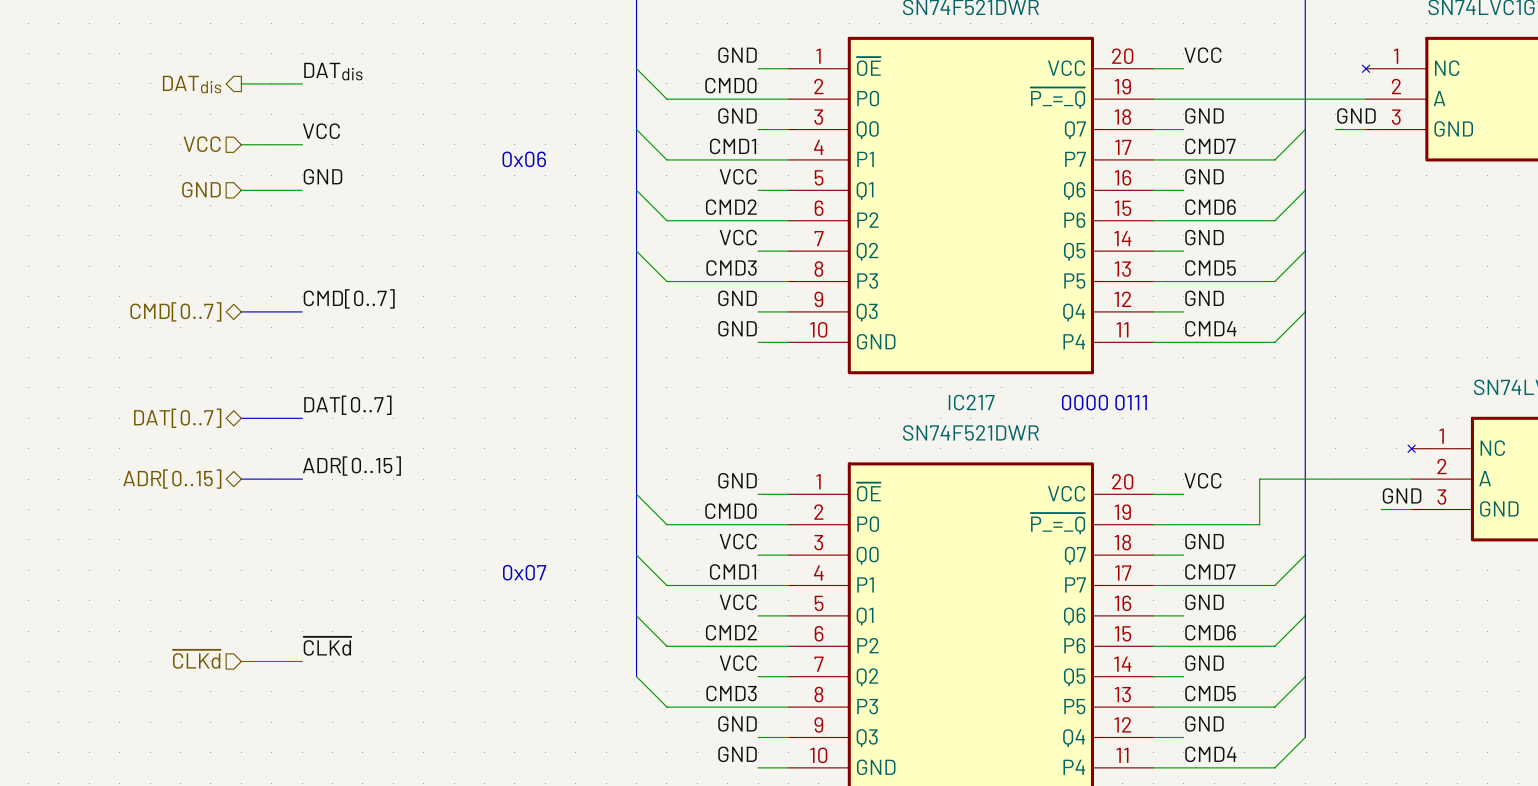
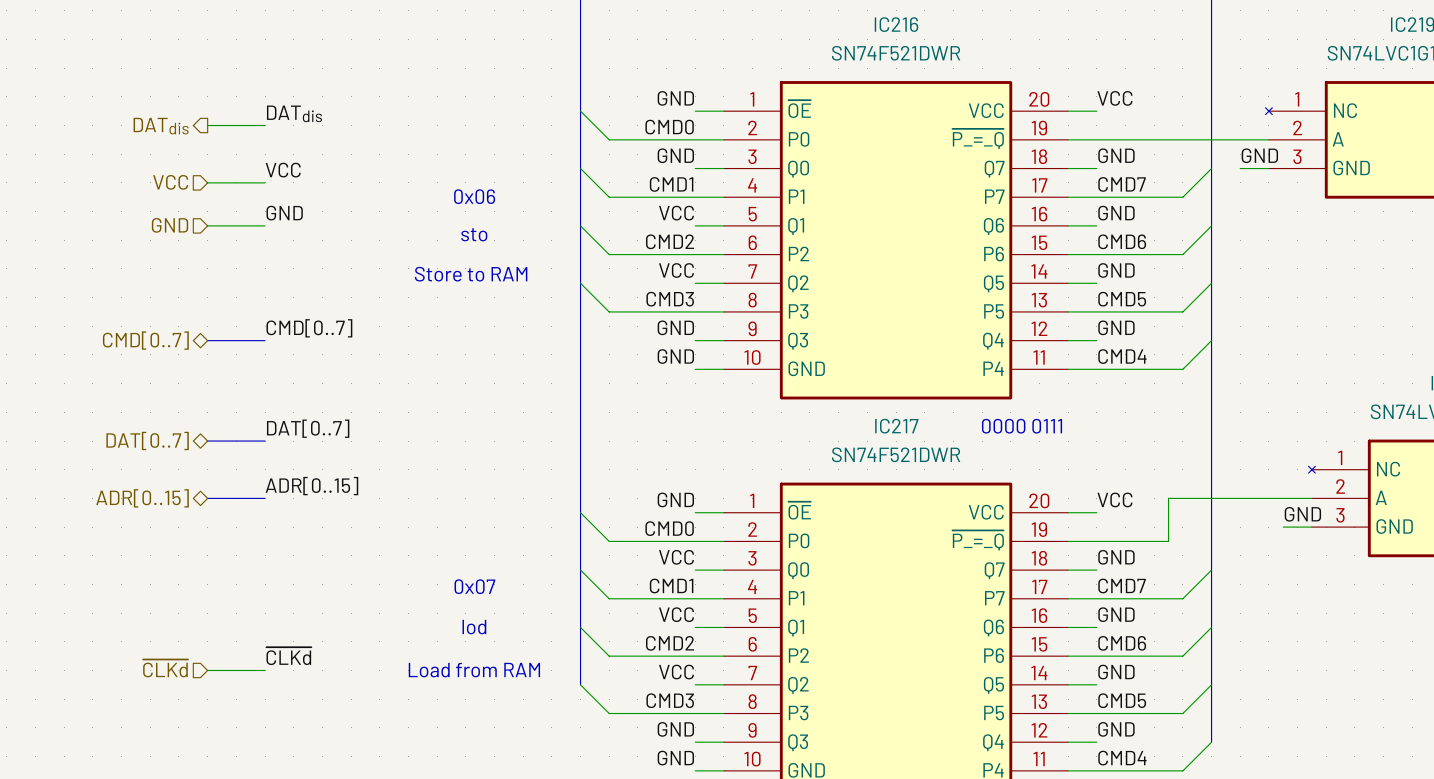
text: none -> sto (474, 234)
text: none -> Store to RAM (471, 274)
text: none -> lod (474, 627)
text: none -> Load from RAM (474, 670)

